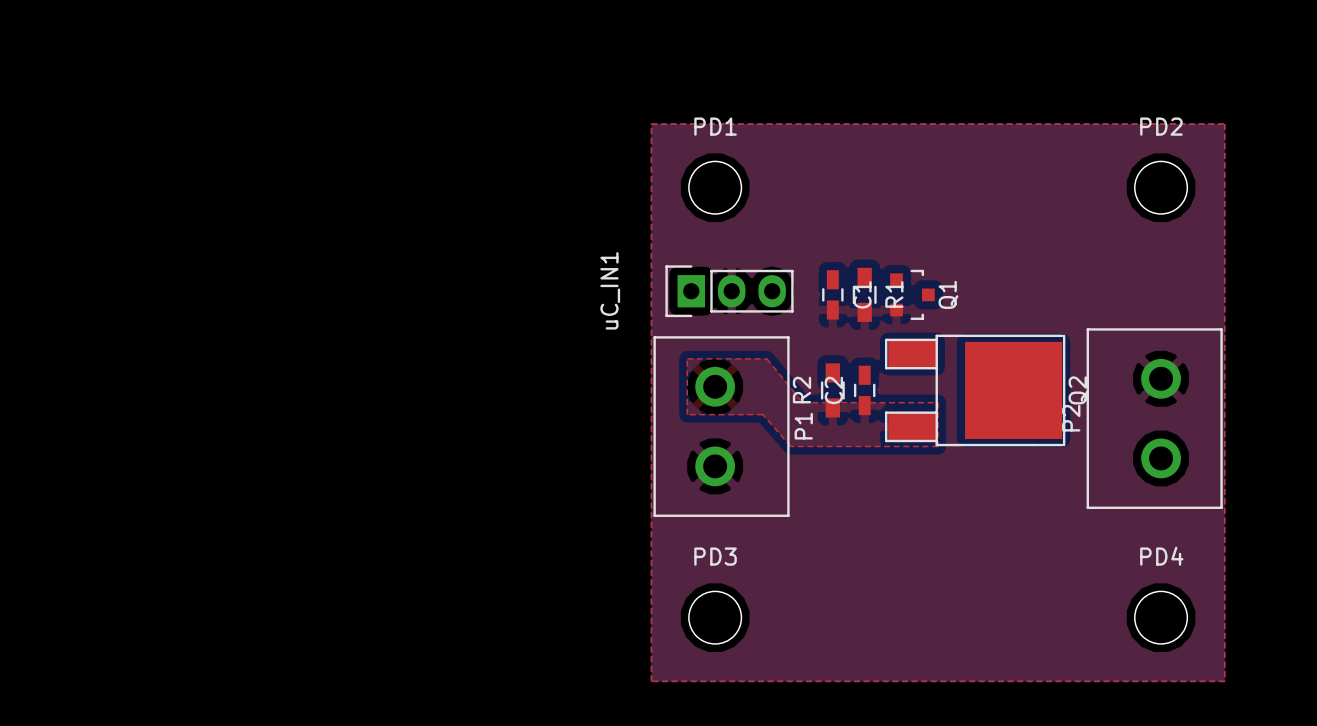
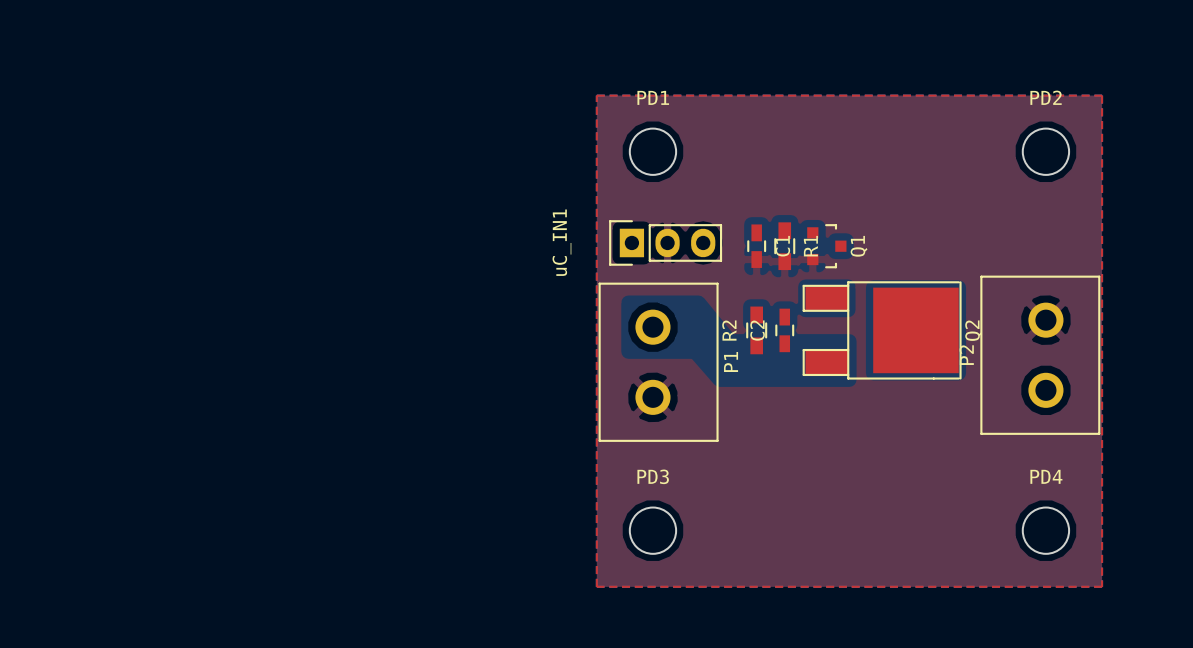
top zone outline: (687, 358) (687, 414) (762, 414) (790, 446) (938, 446) (938, 402) (802, 402) (766, 358) (687, 358) -> none

